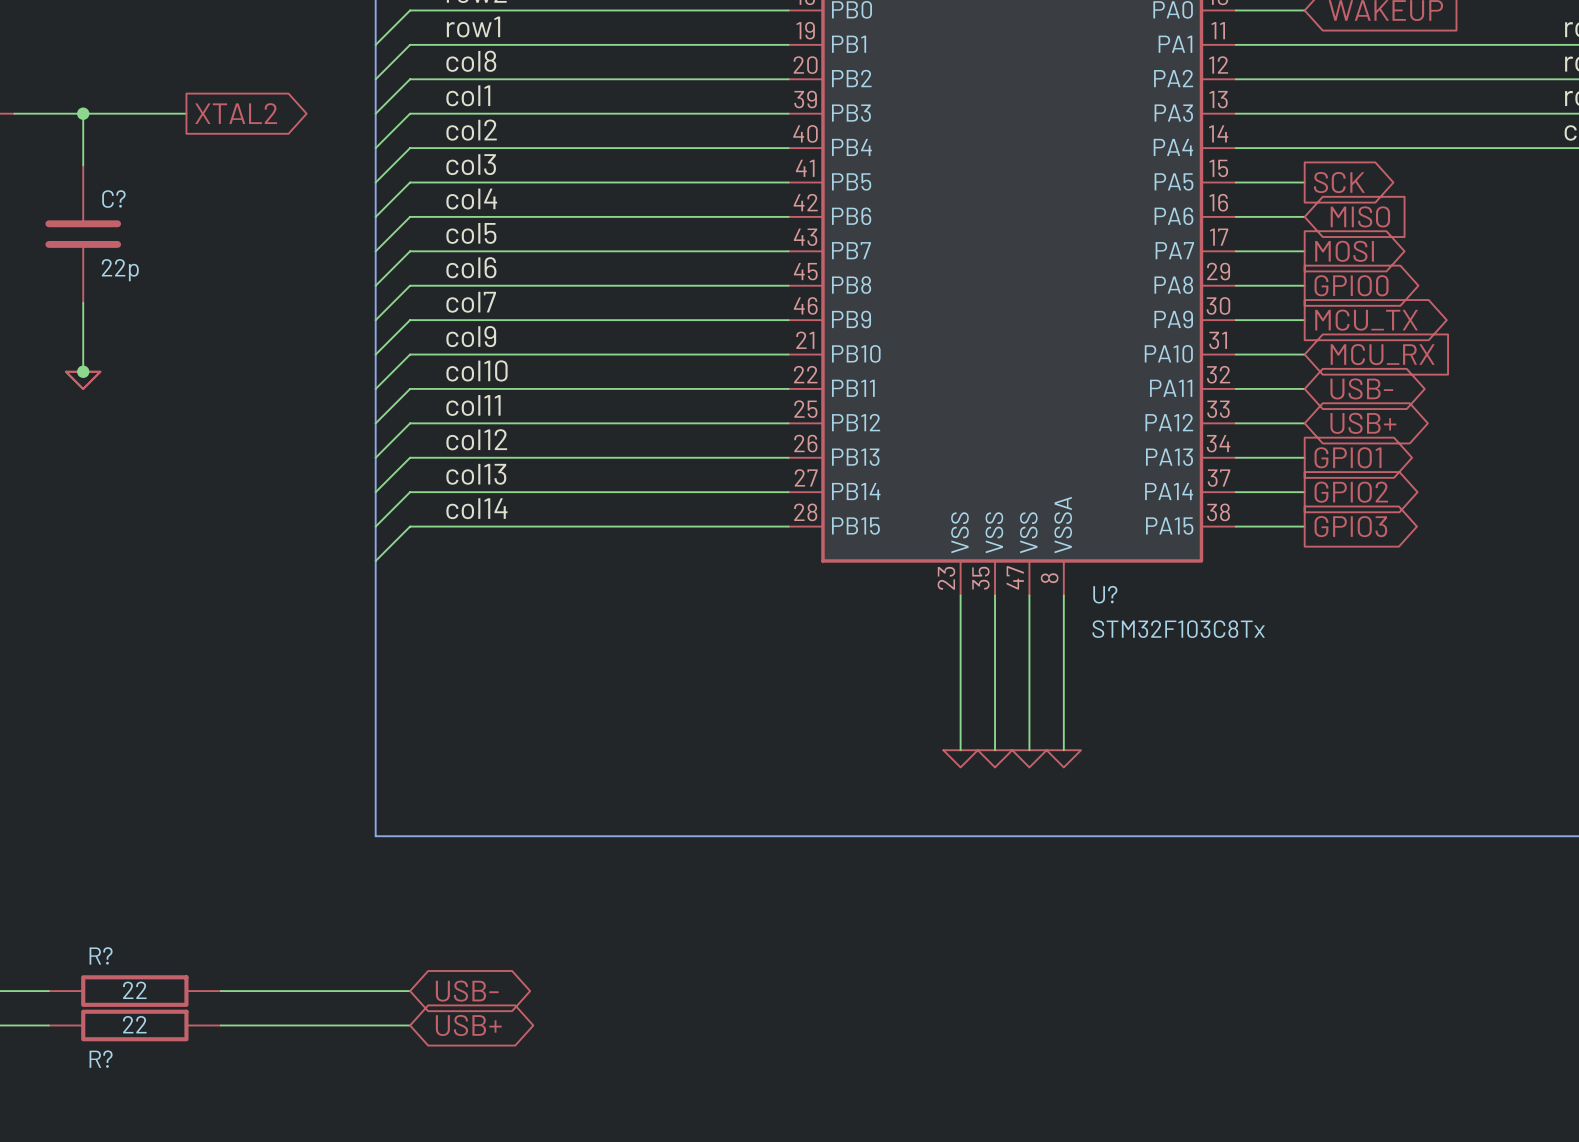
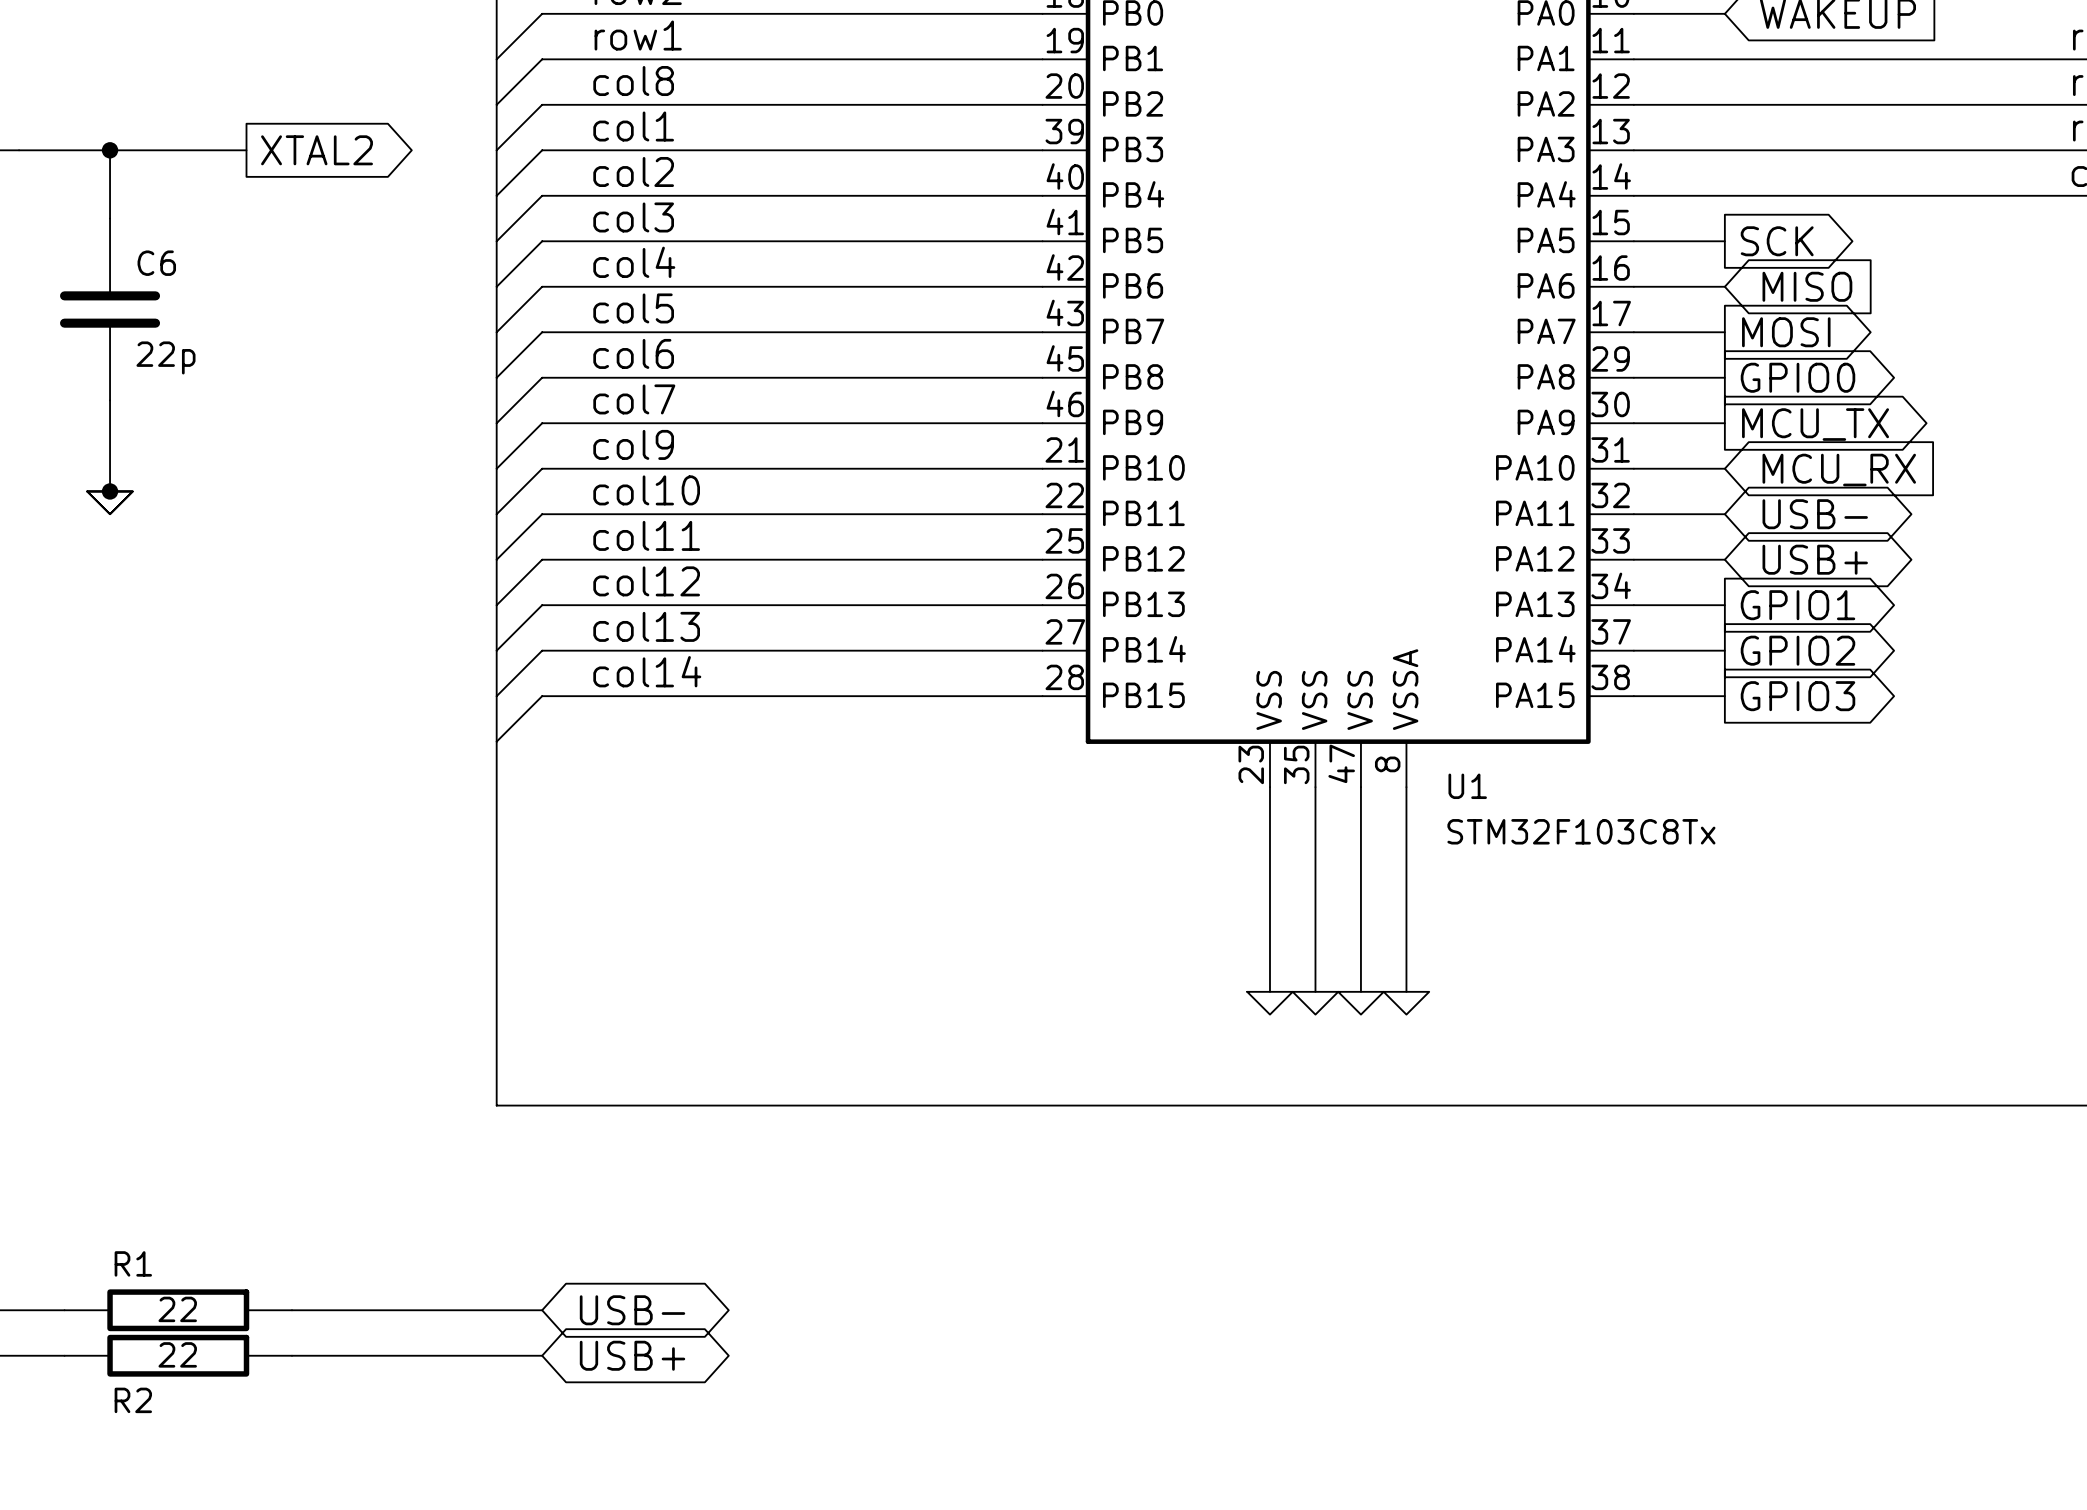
C? name: C? (113, 199) -> C6 (156, 263)
U? name: U? (1105, 594) -> U1 (1467, 786)
R? name: R? (101, 955) -> R1 (133, 1263)
R? name: R? (101, 1059) -> R2 (133, 1400)

